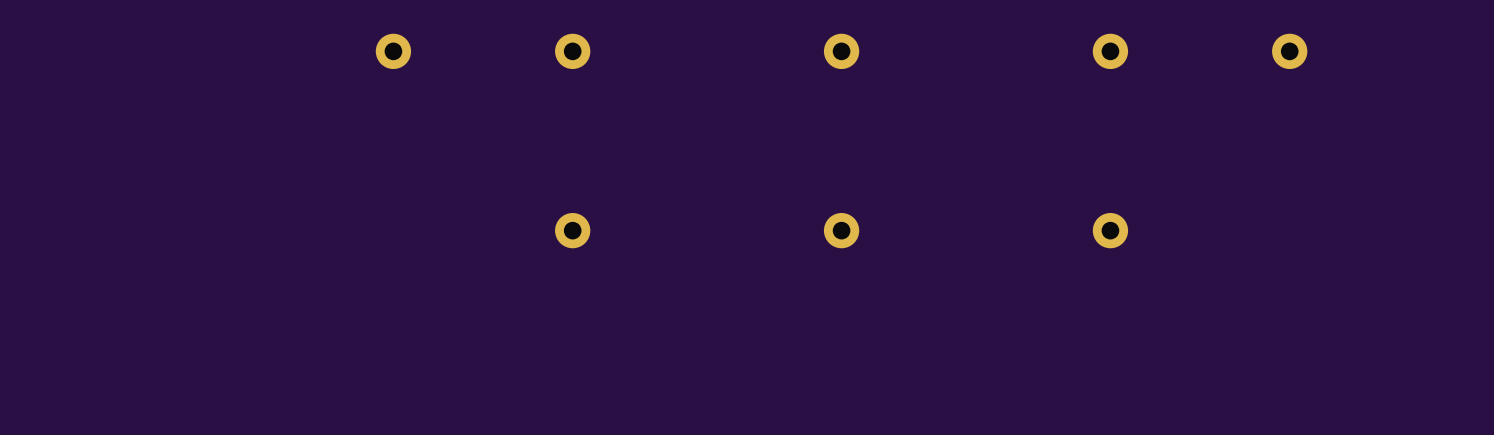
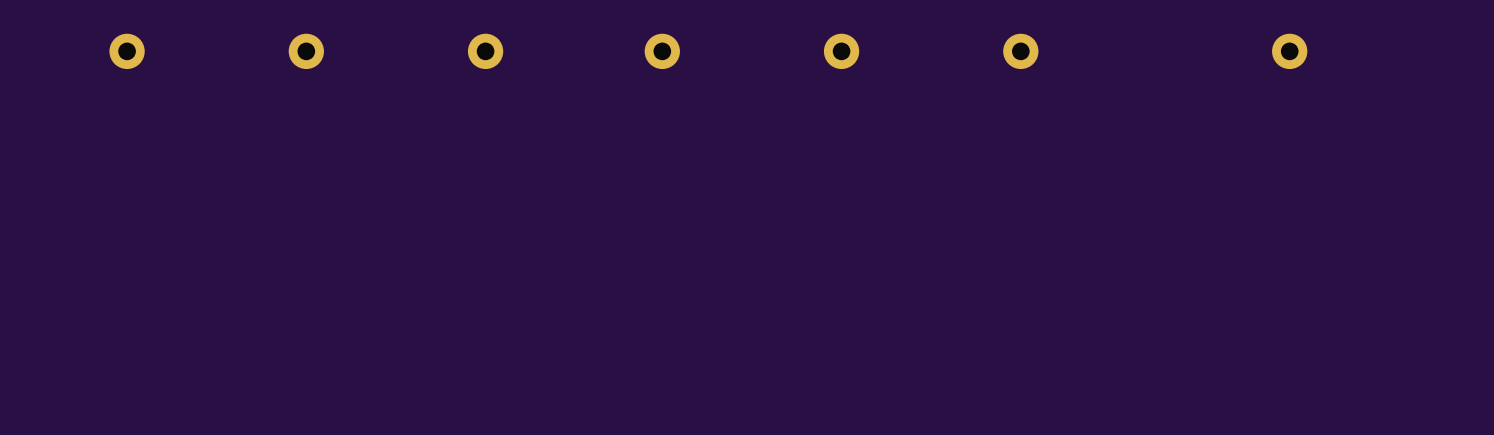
part: none -> (127, 51)
part: none -> (306, 51)
part: (393, 51) -> none
part: none -> (485, 51)
part: (572, 51) -> none
part: none -> (662, 51)
part position: (1110, 51) -> (1020, 51)
part: (572, 230) -> none
part: (841, 230) -> none
part: (1110, 230) -> none

